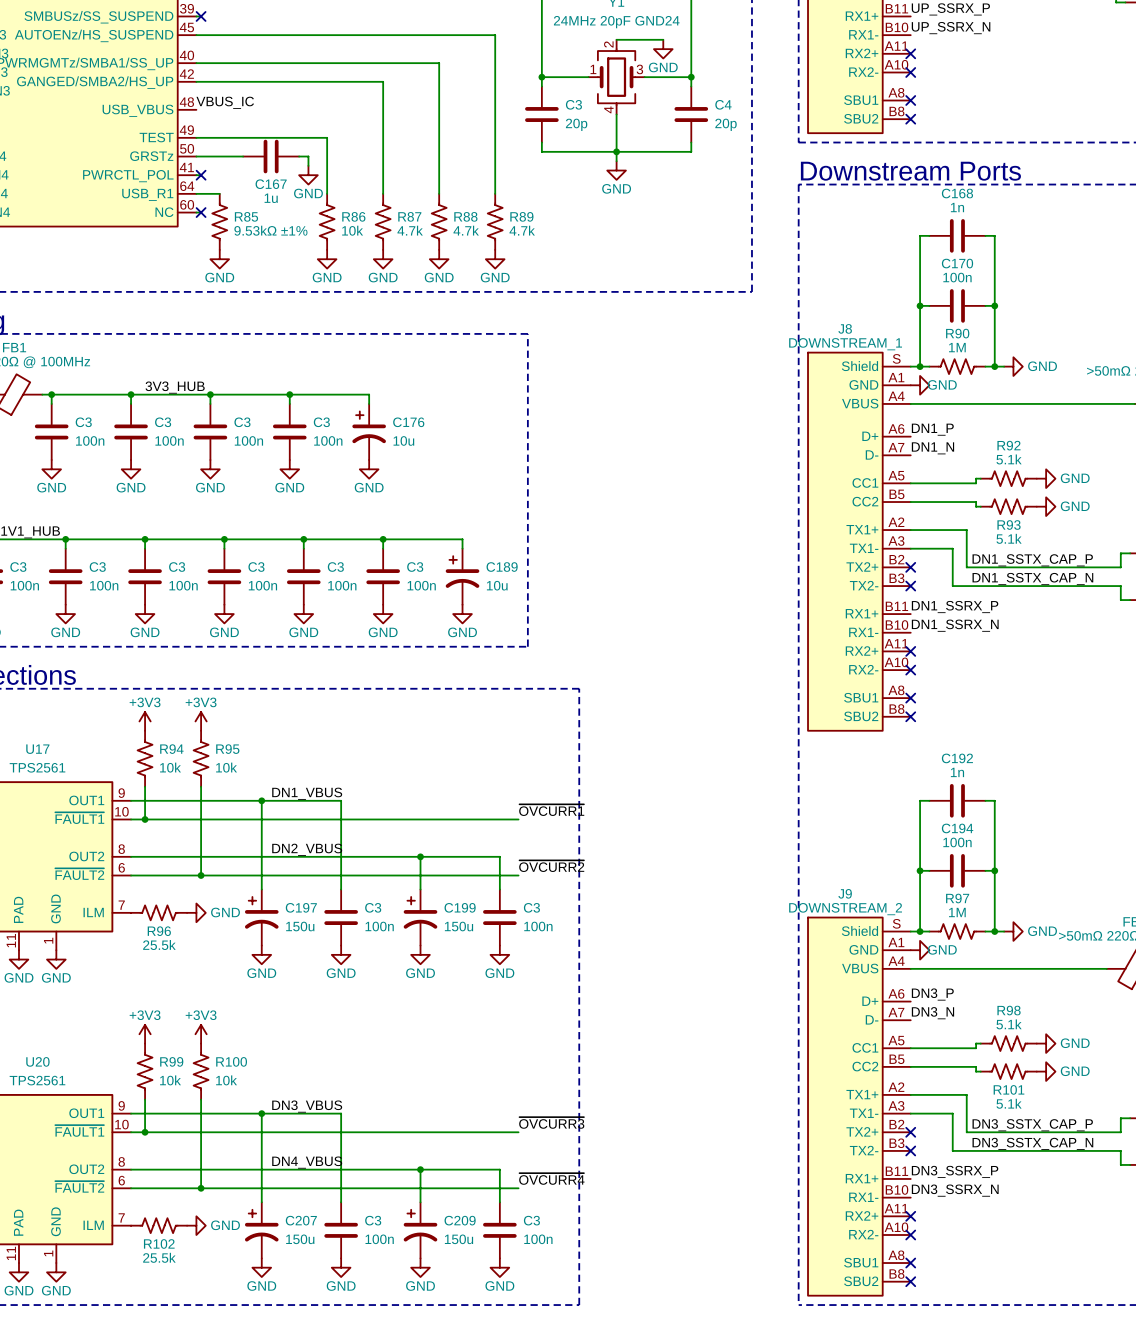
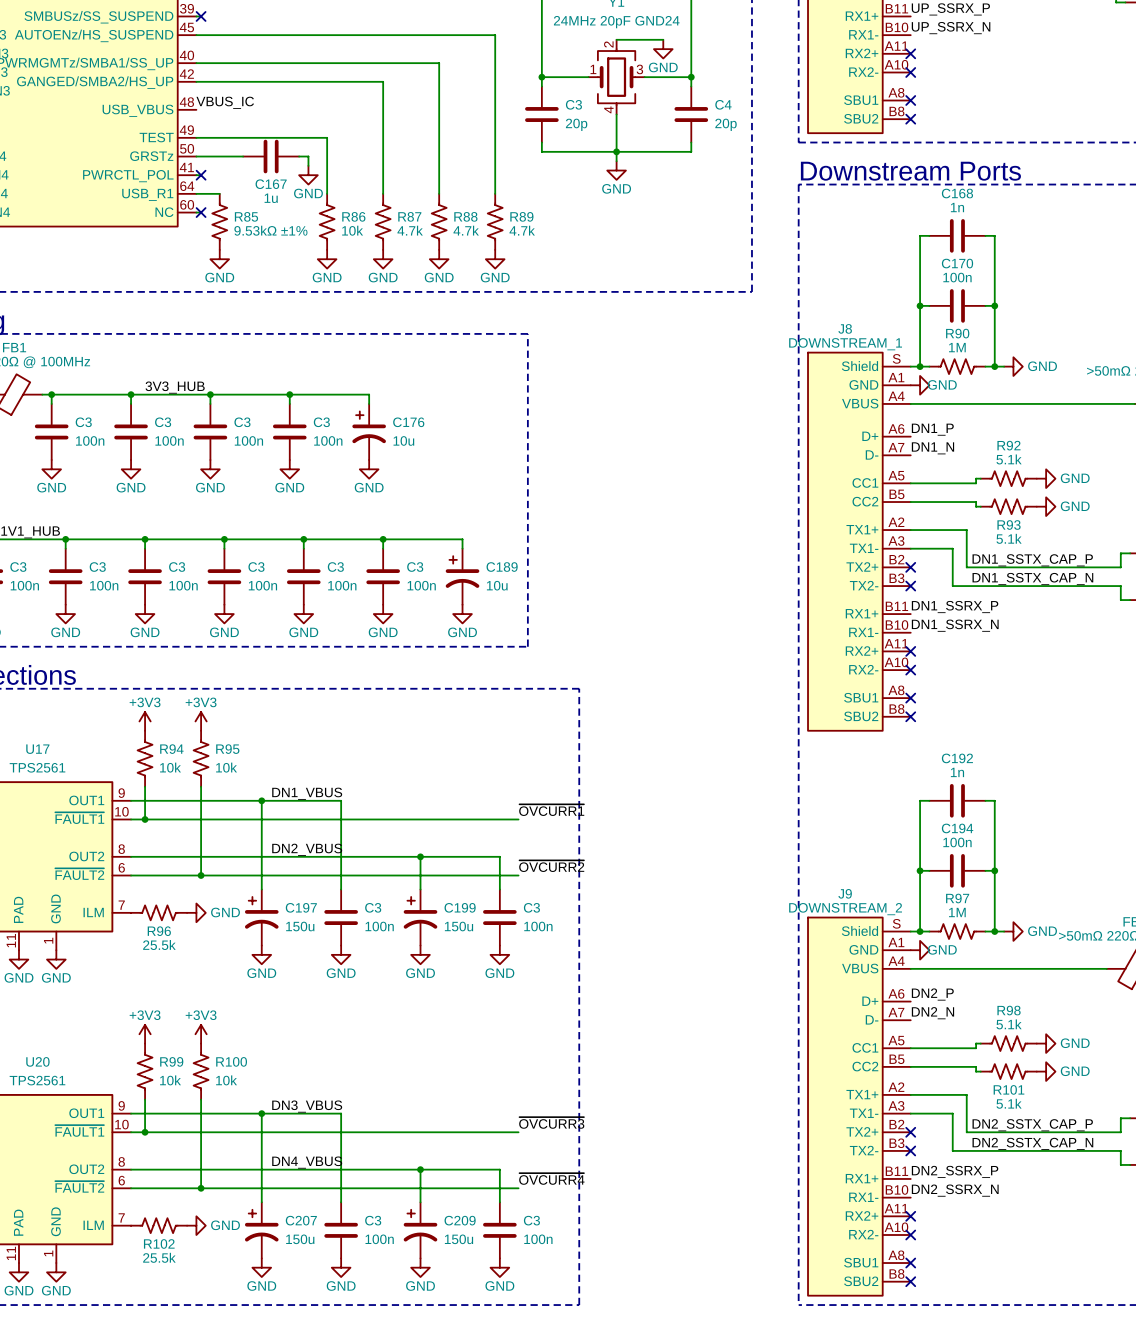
label: DN3_P (932, 994) -> DN2_P (932, 994)
label: DN3_N (932, 1013) -> DN2_N (932, 1013)
label: DN3_SSTX_CAP_P (1032, 1125) -> DN2_SSTX_CAP_P (1032, 1125)
label: DN3_SSTX_CAP_N (1032, 1143) -> DN2_SSTX_CAP_N (1032, 1143)
label: DN3_SSRX_P (955, 1171) -> DN2_SSRX_P (955, 1171)
label: DN3_SSRX_N (955, 1190) -> DN2_SSRX_N (955, 1190)

